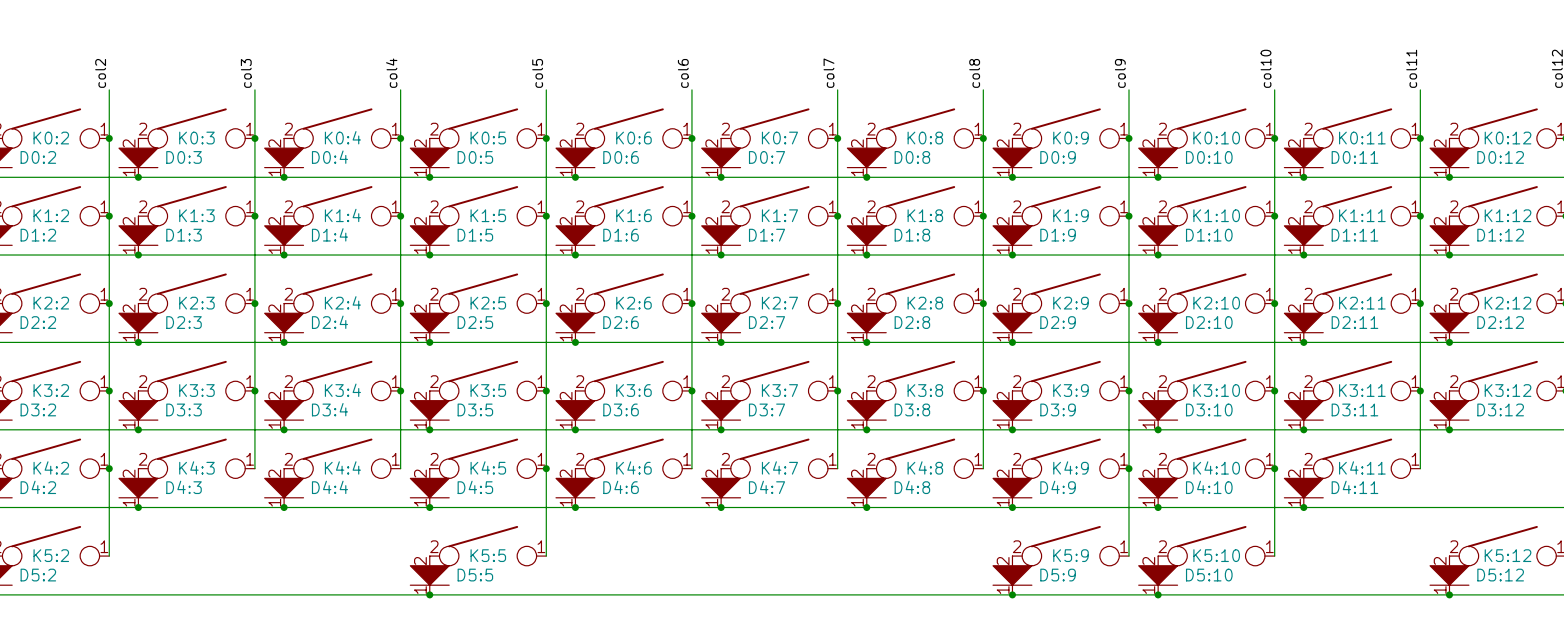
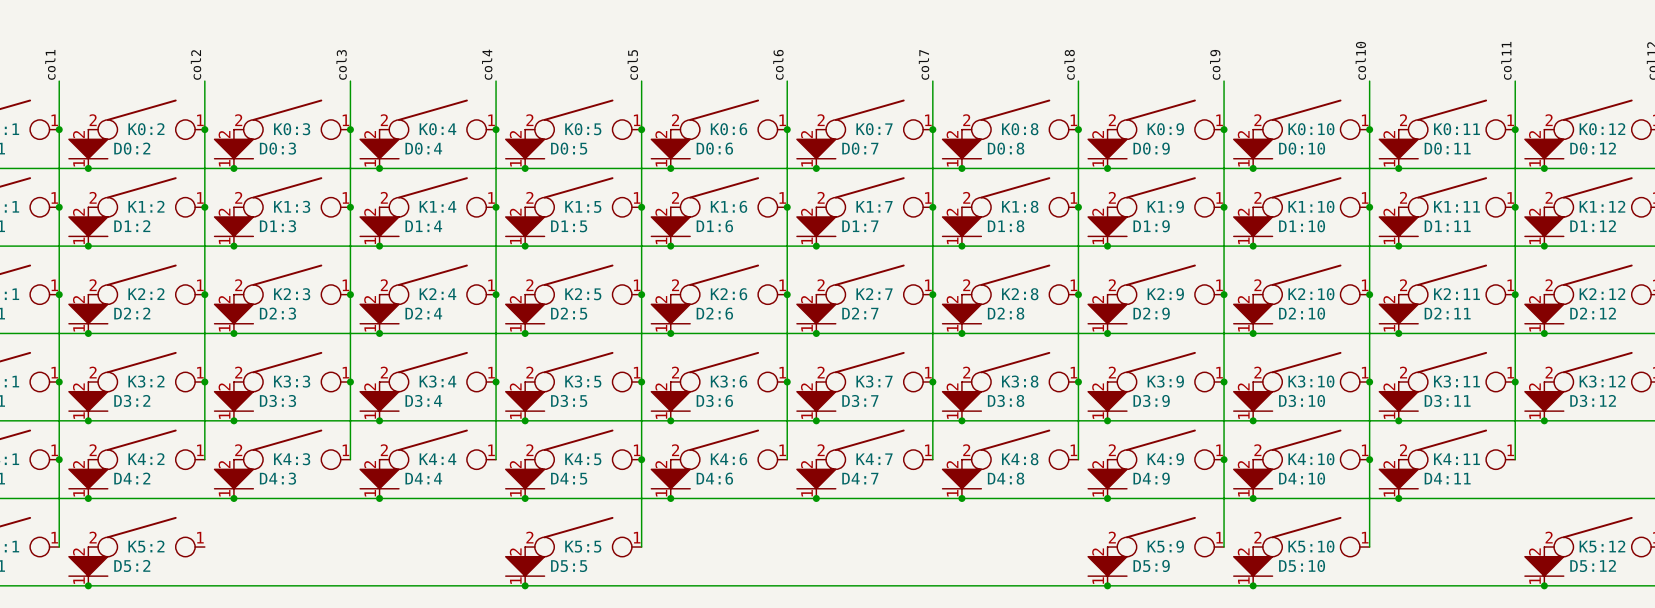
wire: (109, 468) (109, 556) -> none
junction: (109, 468) -> none

